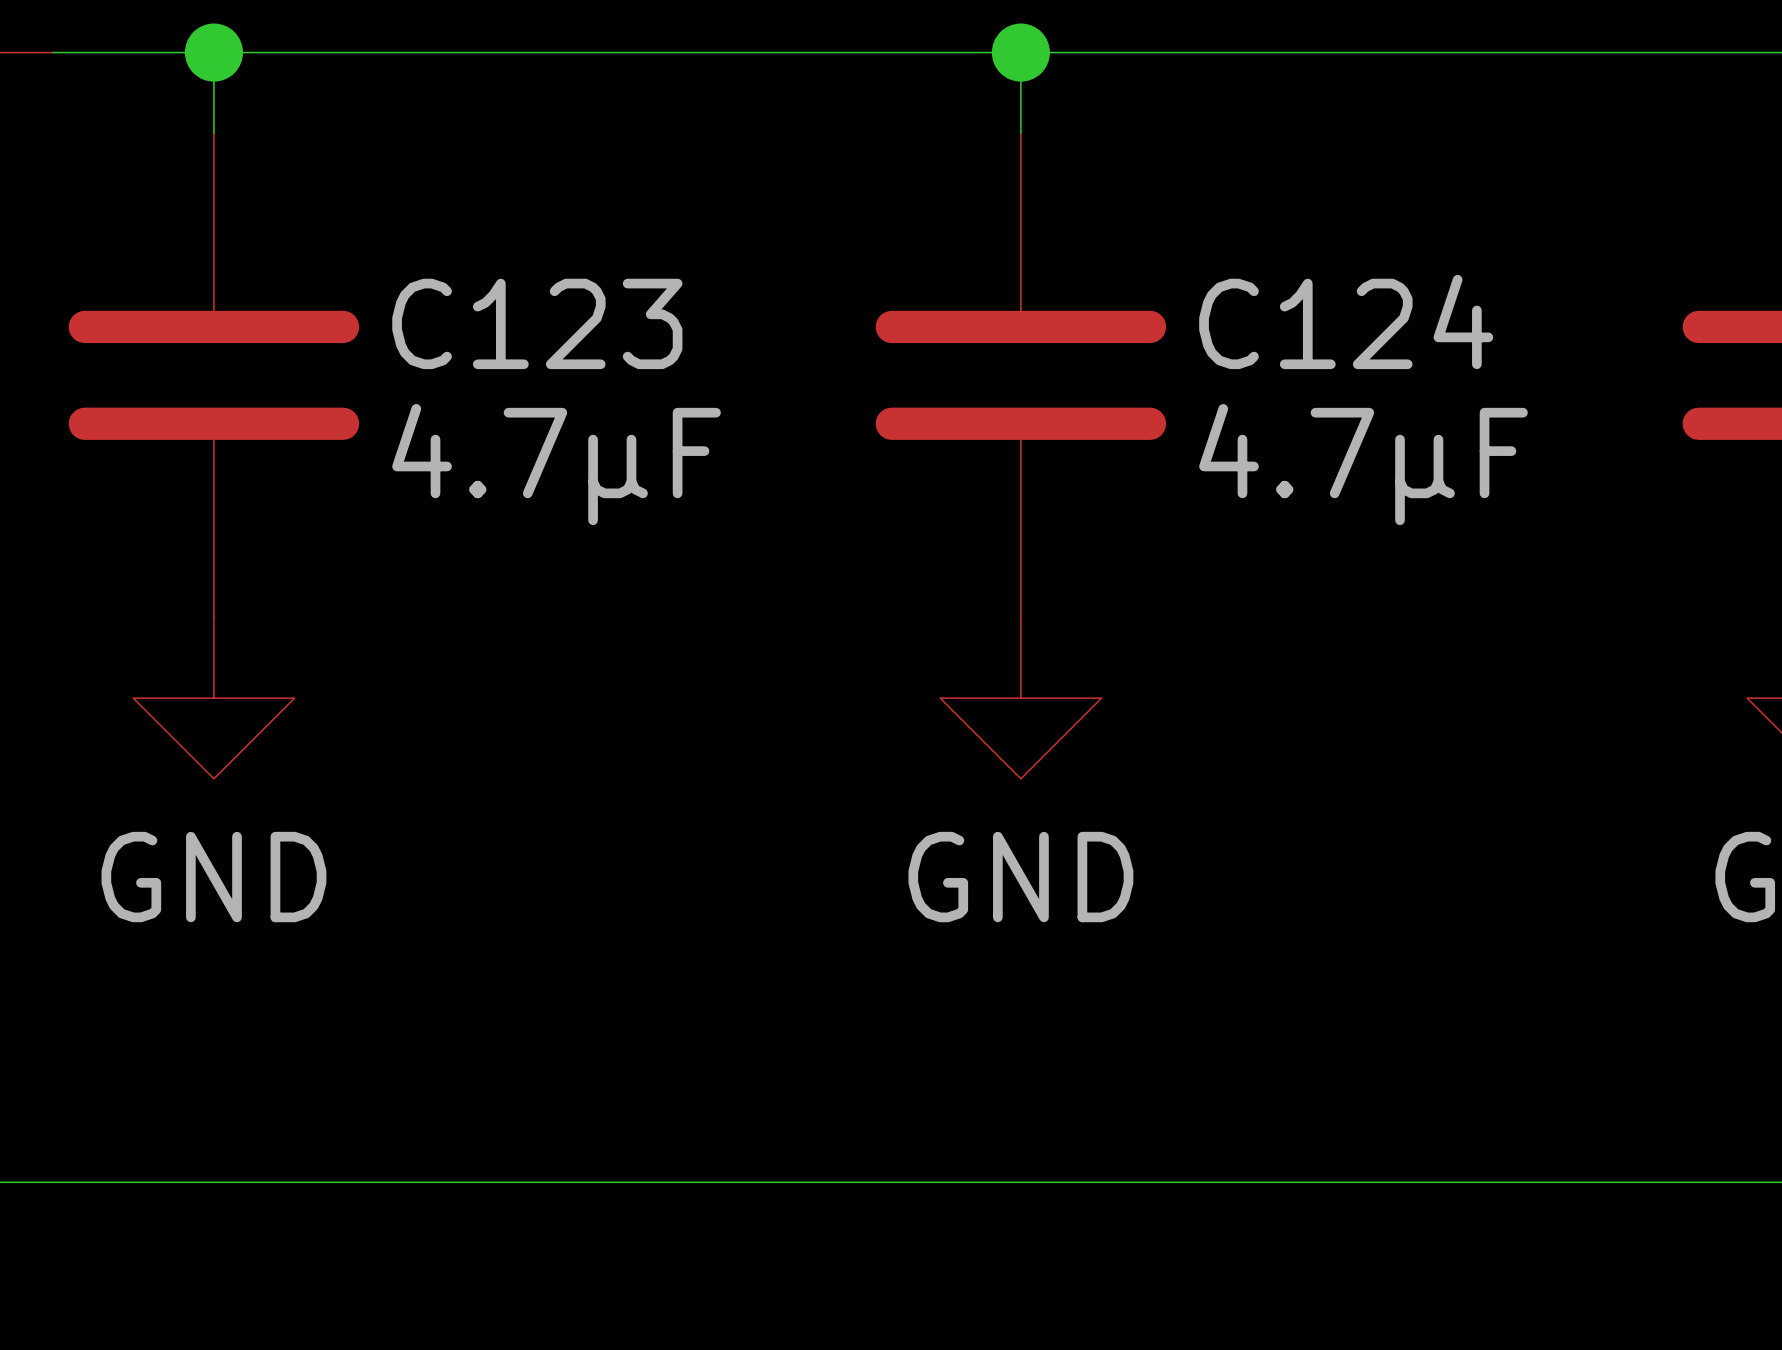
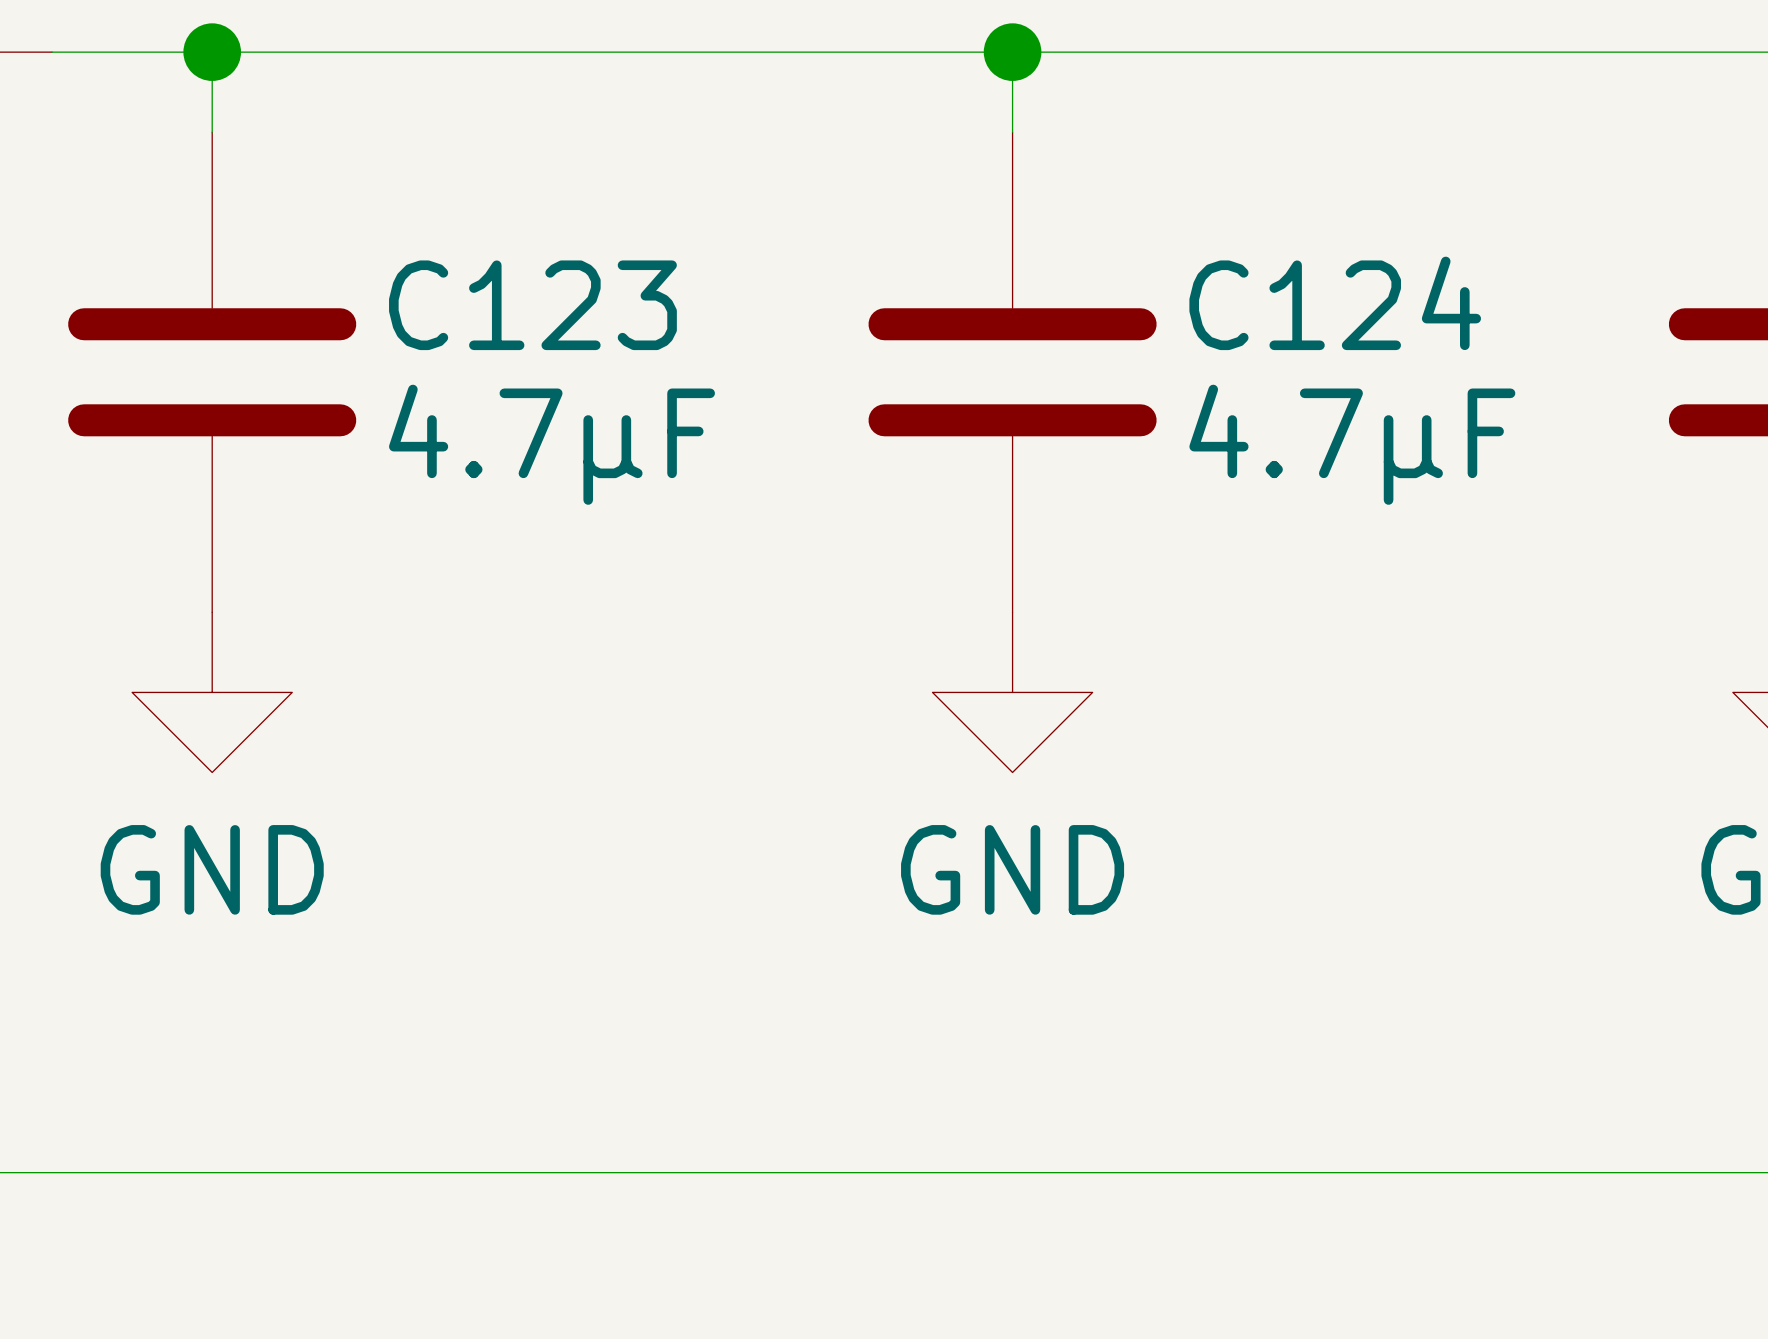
C124 name position: C124 (1346, 321) -> C124 (1335, 303)
C123 name position: C123 (537, 323) -> C123 (532, 305)
C123 value position: 4.7μF (556, 464) -> 4.7μF (552, 444)
C124 value position: 4.7μF (1363, 464) -> 4.7μF (1352, 444)

